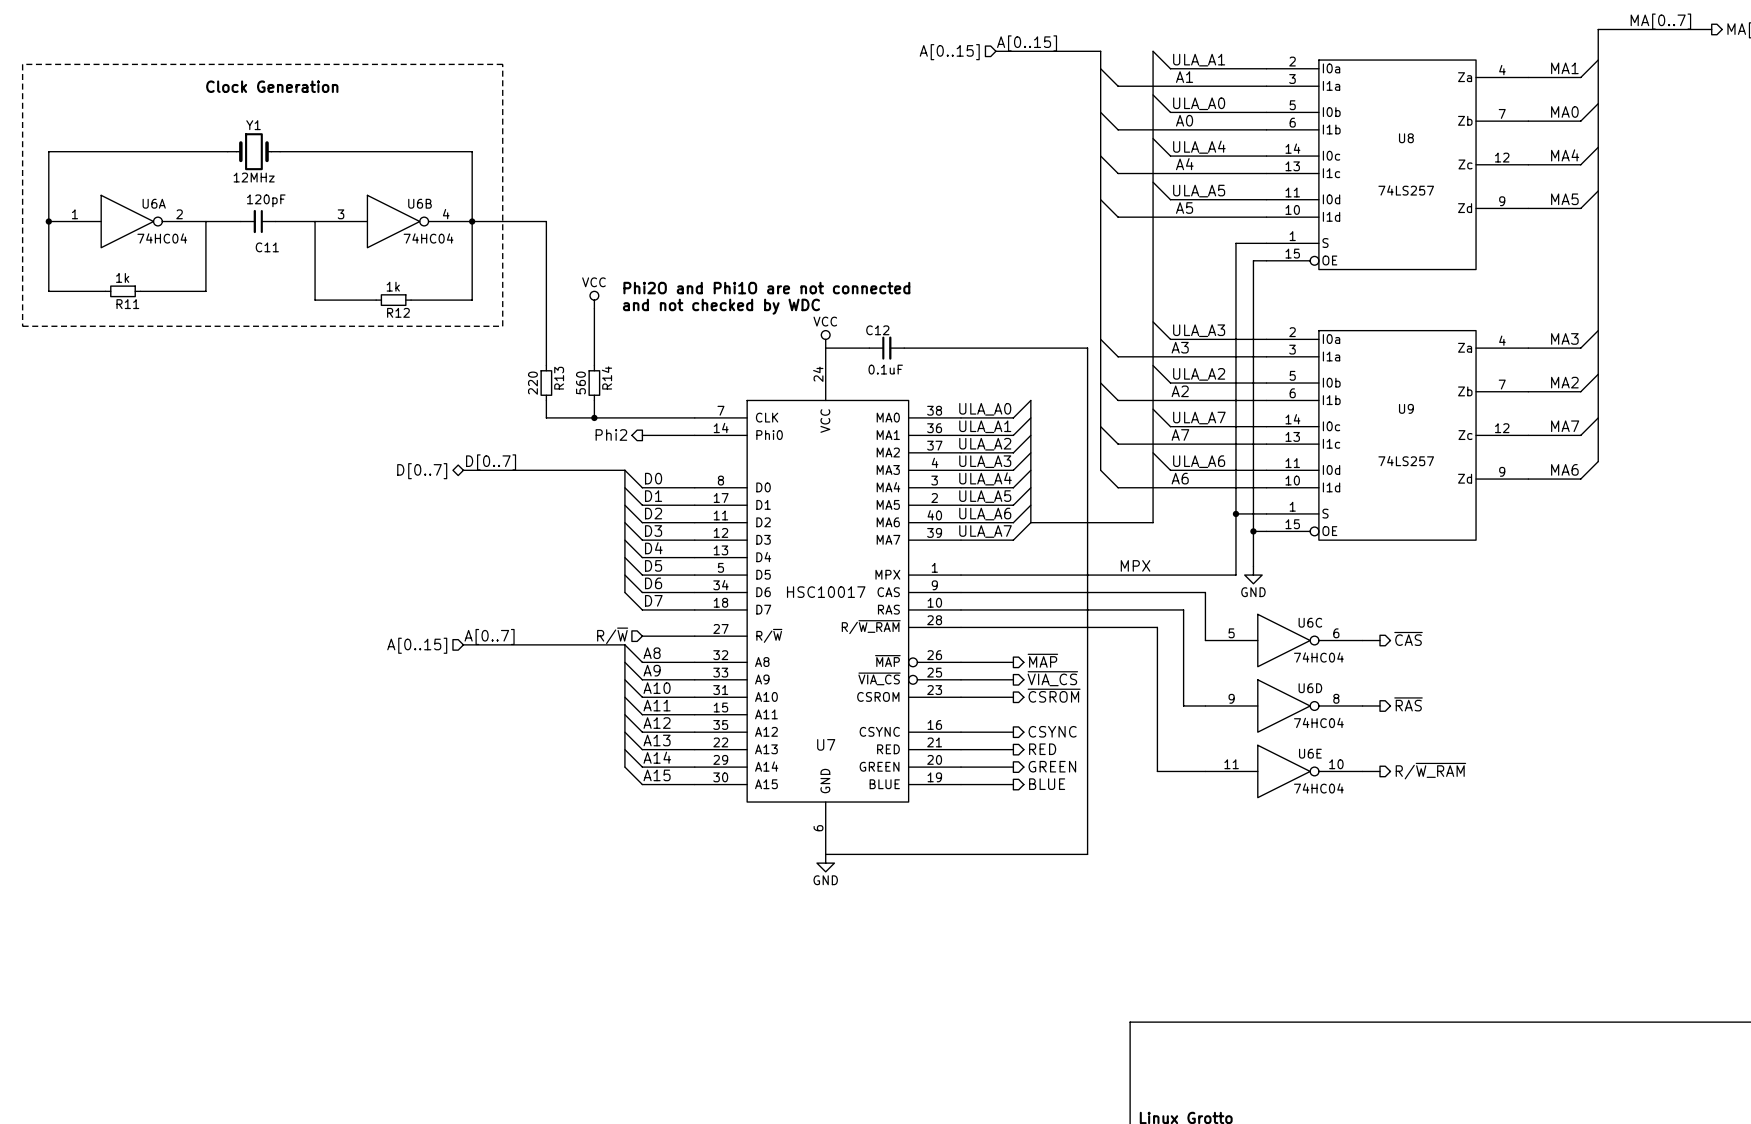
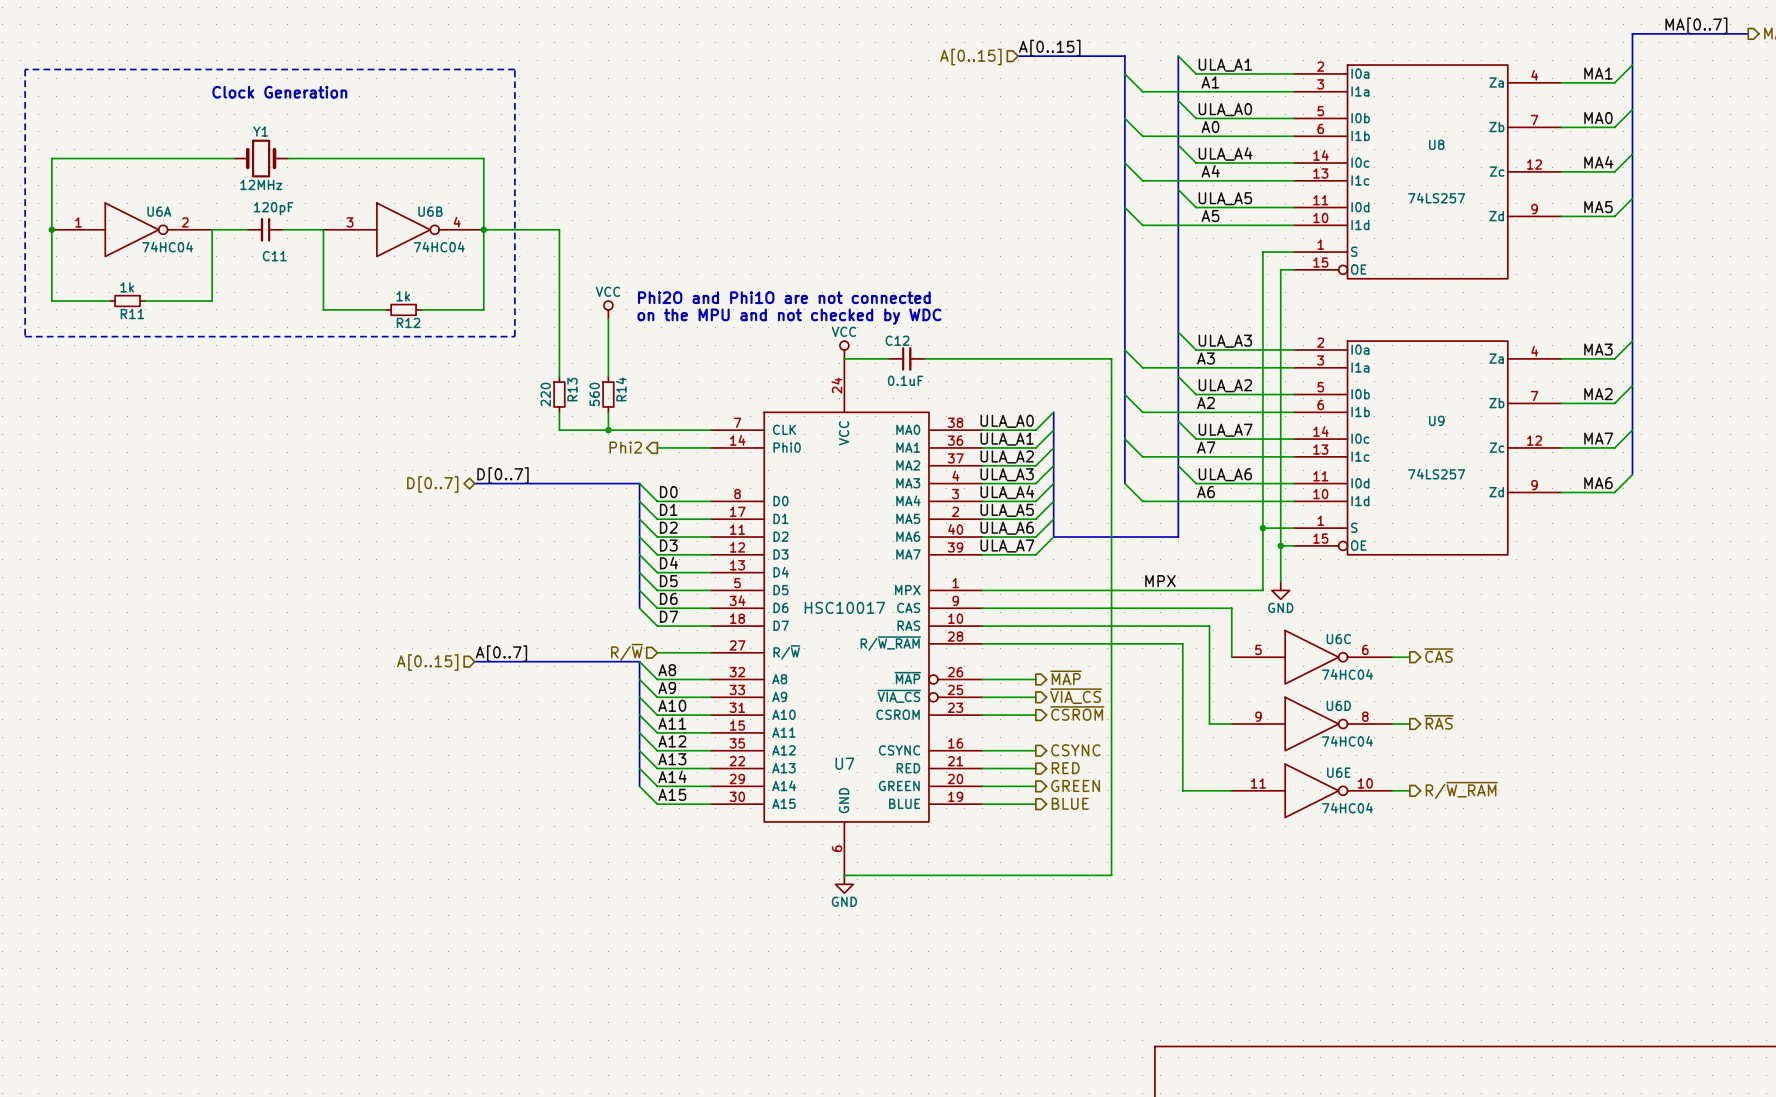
text: and not checked by WDC (721, 306) -> on the MPU and not checked by WDC (789, 316)

